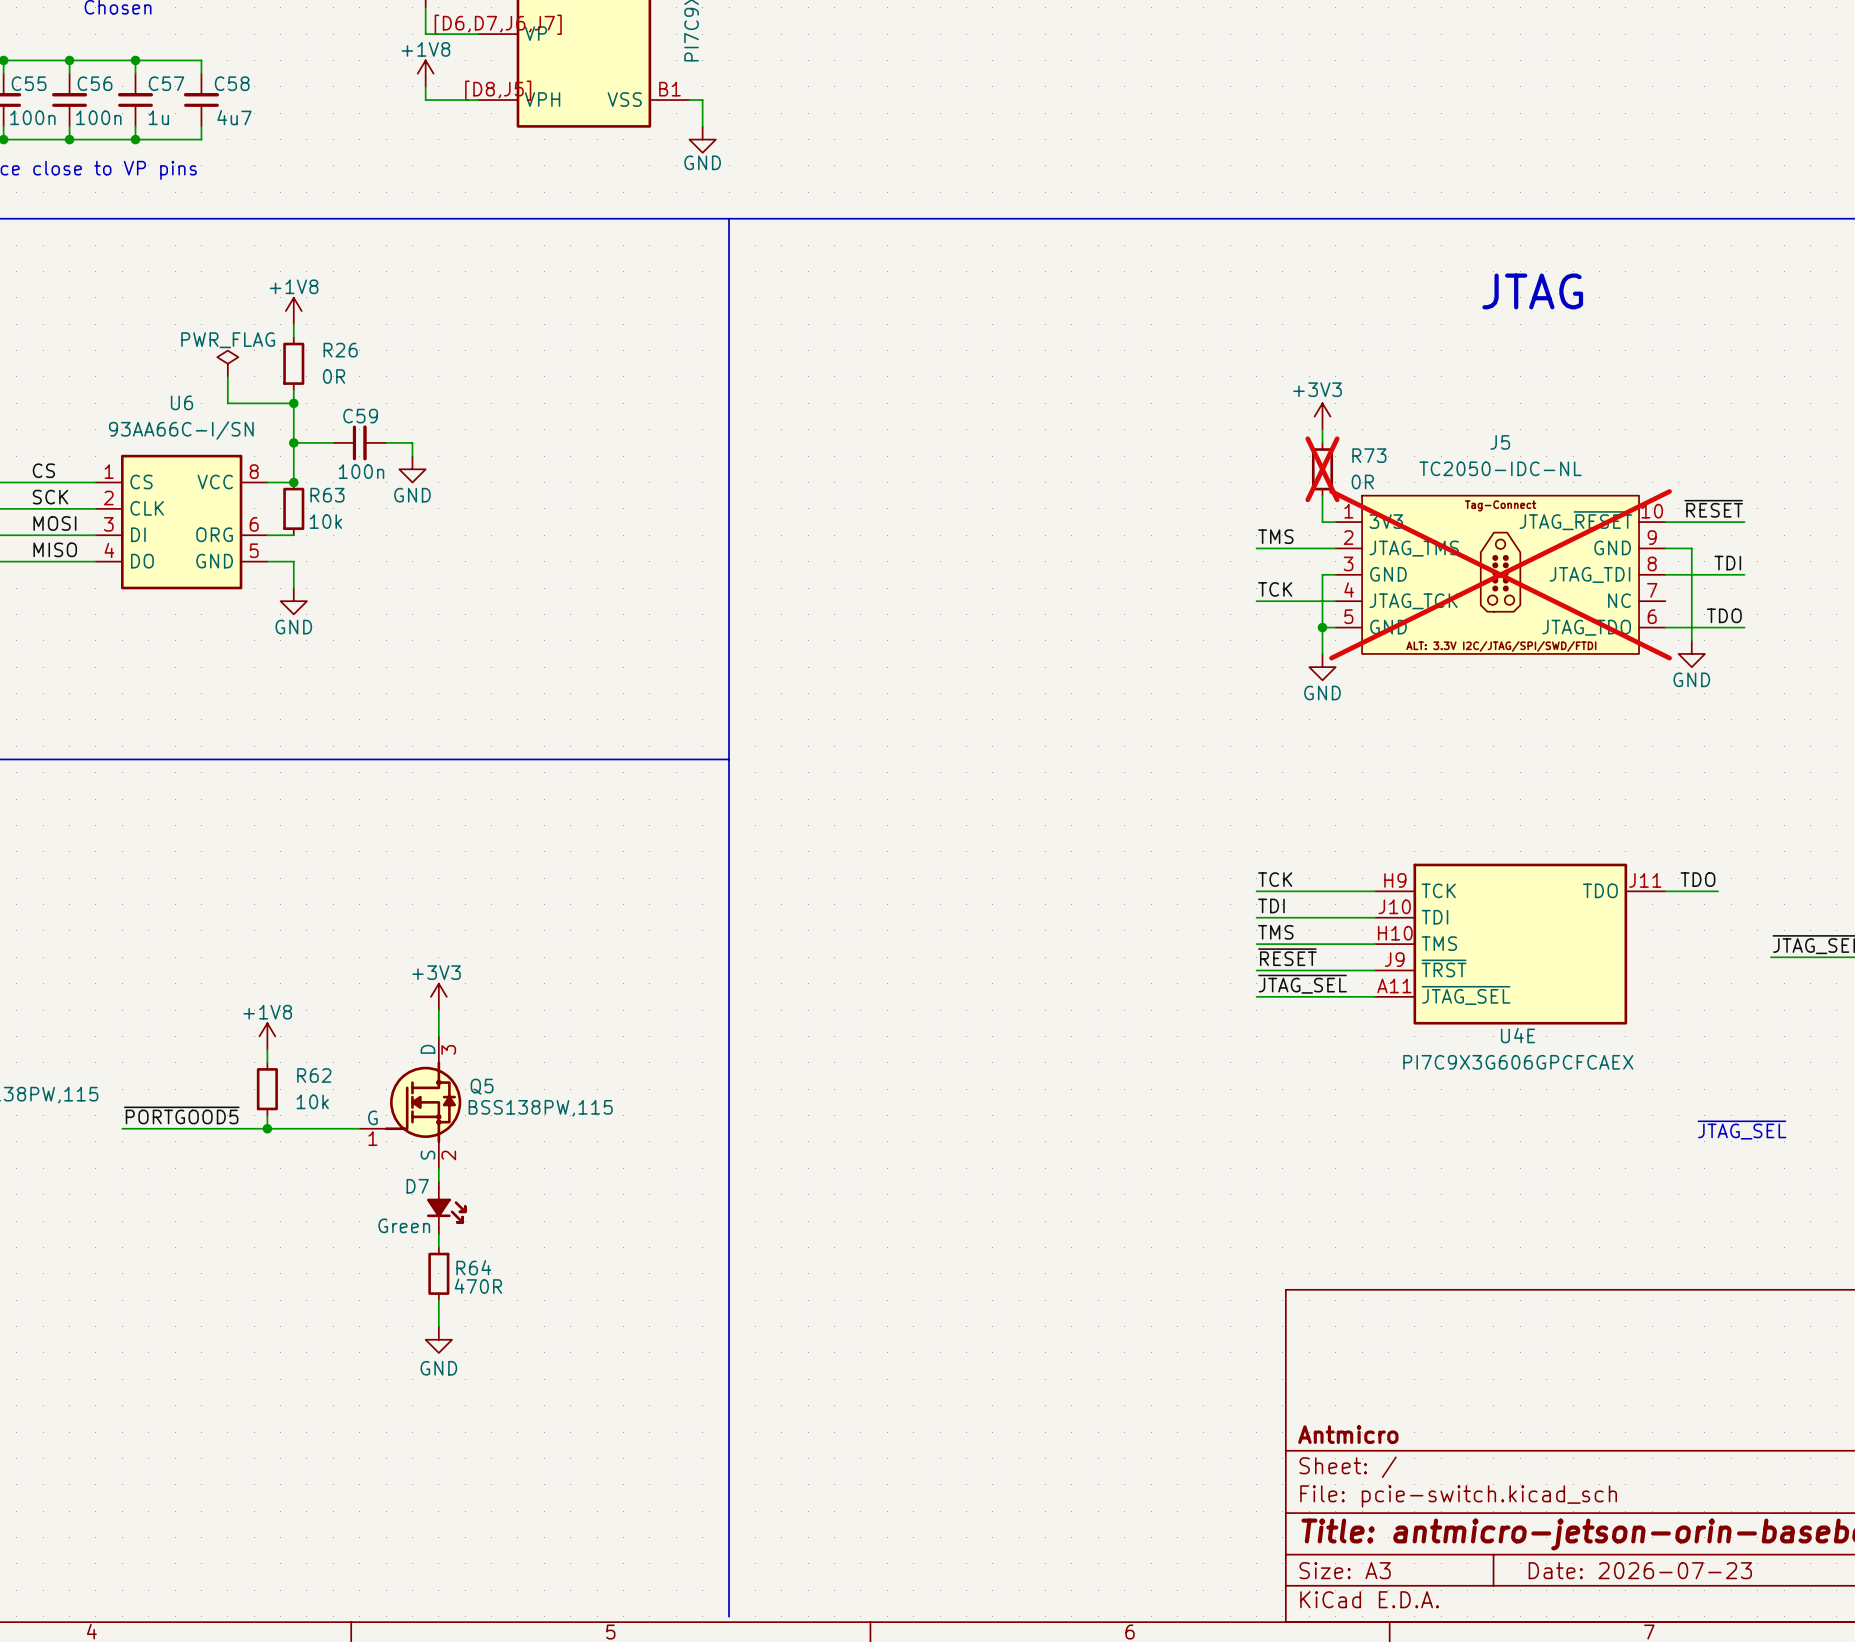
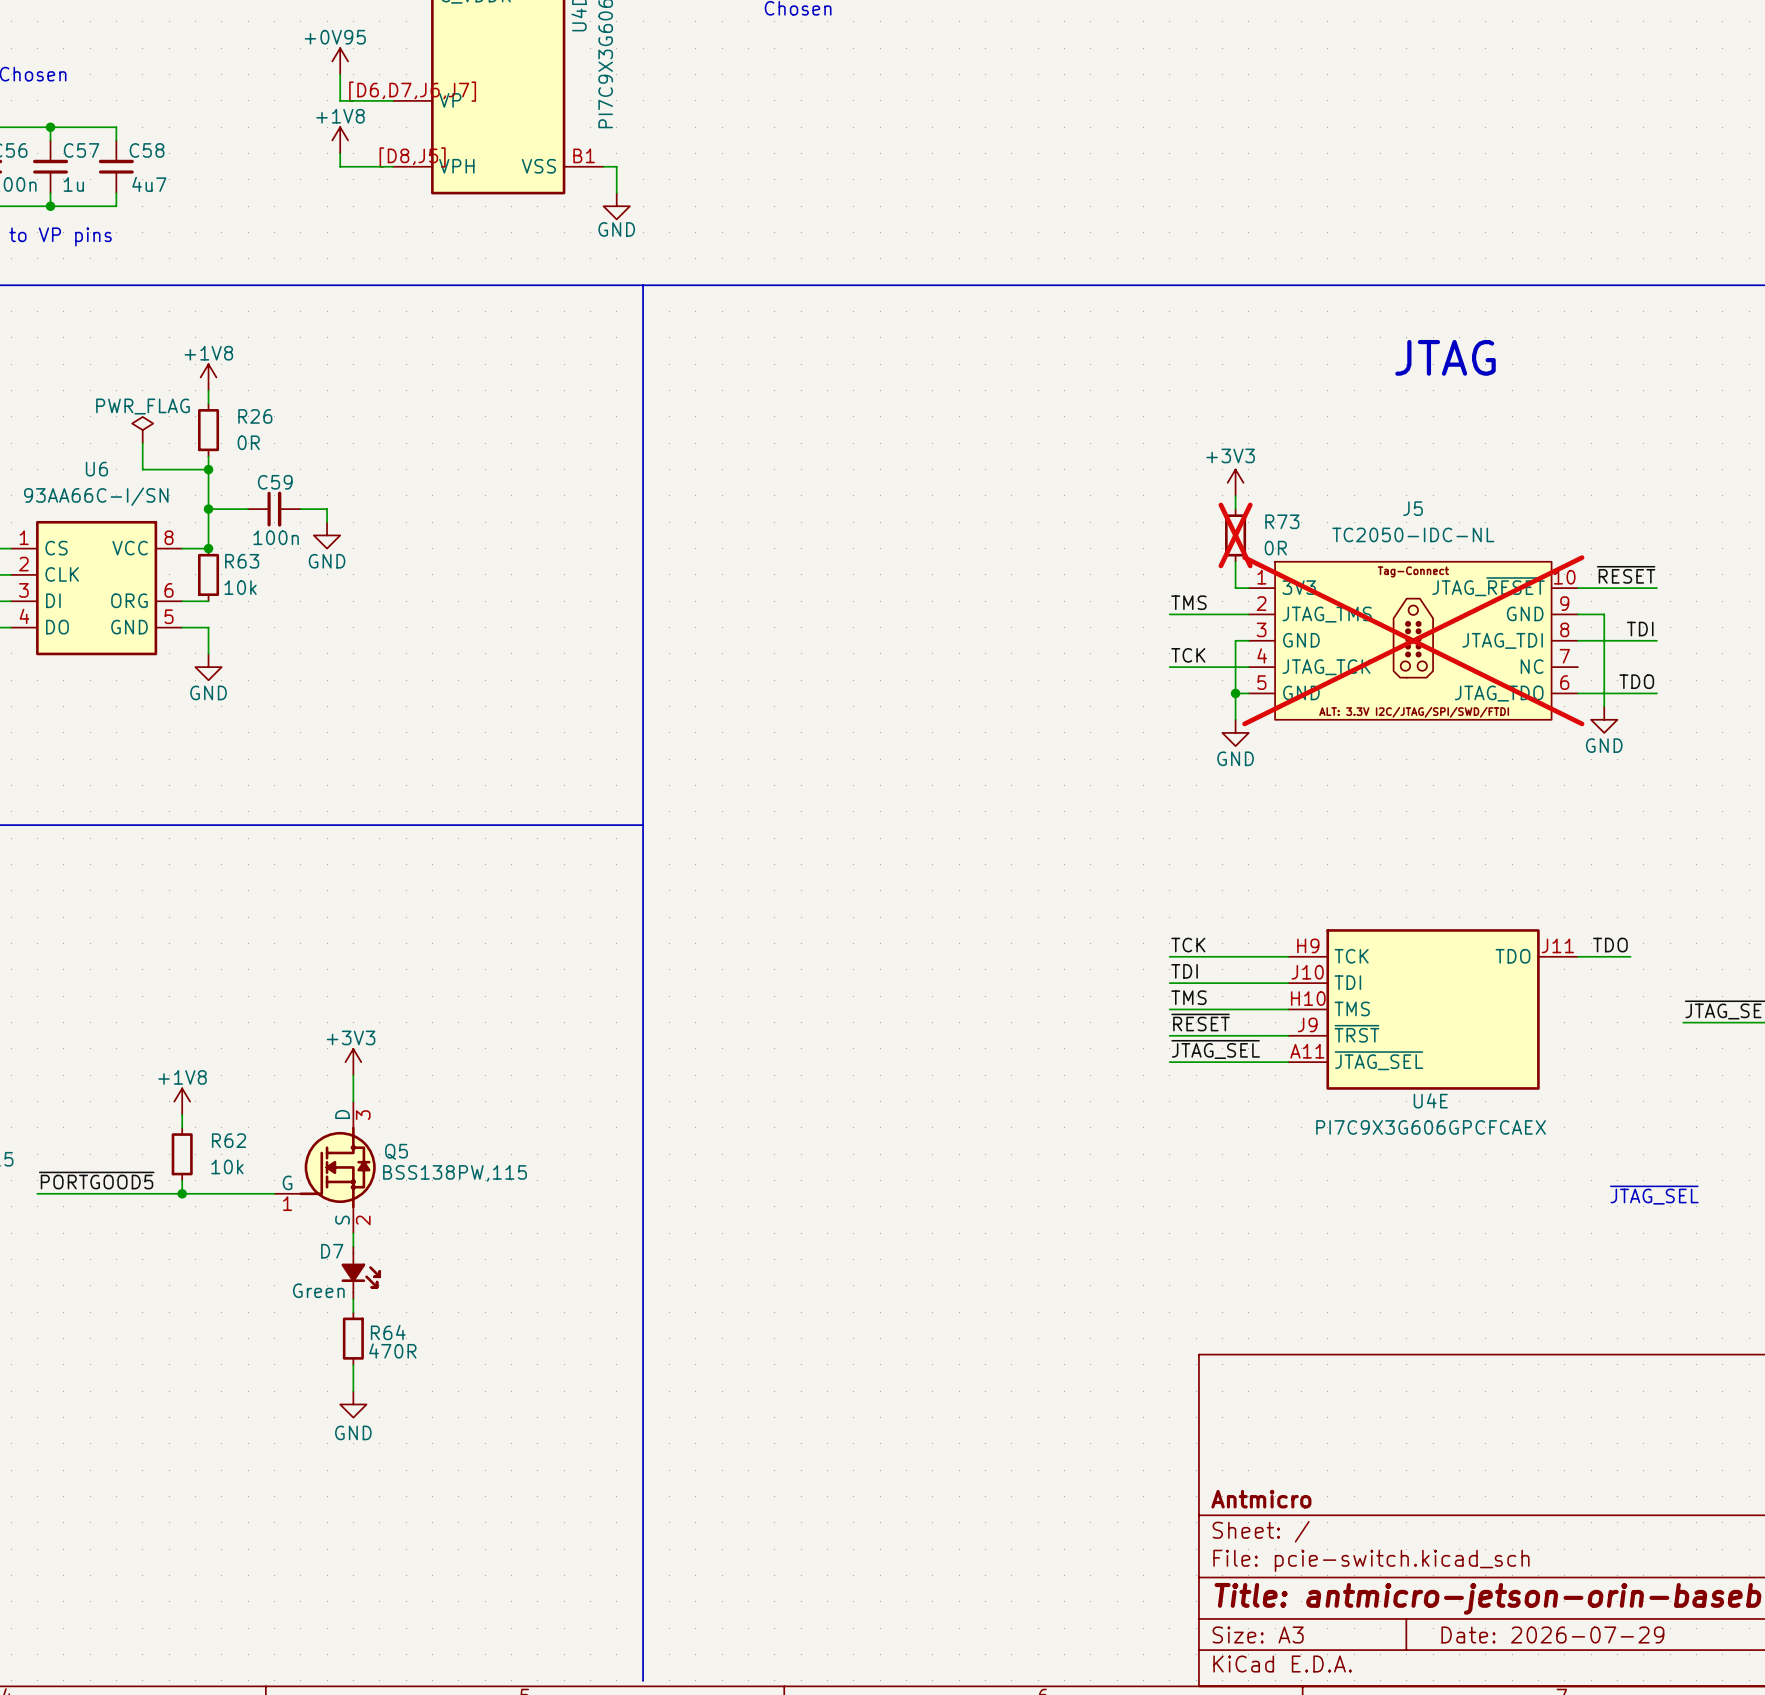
title block: Date: 2026-07-23 (1640, 1570) -> Date: 2026-07-29 (1552, 1634)

